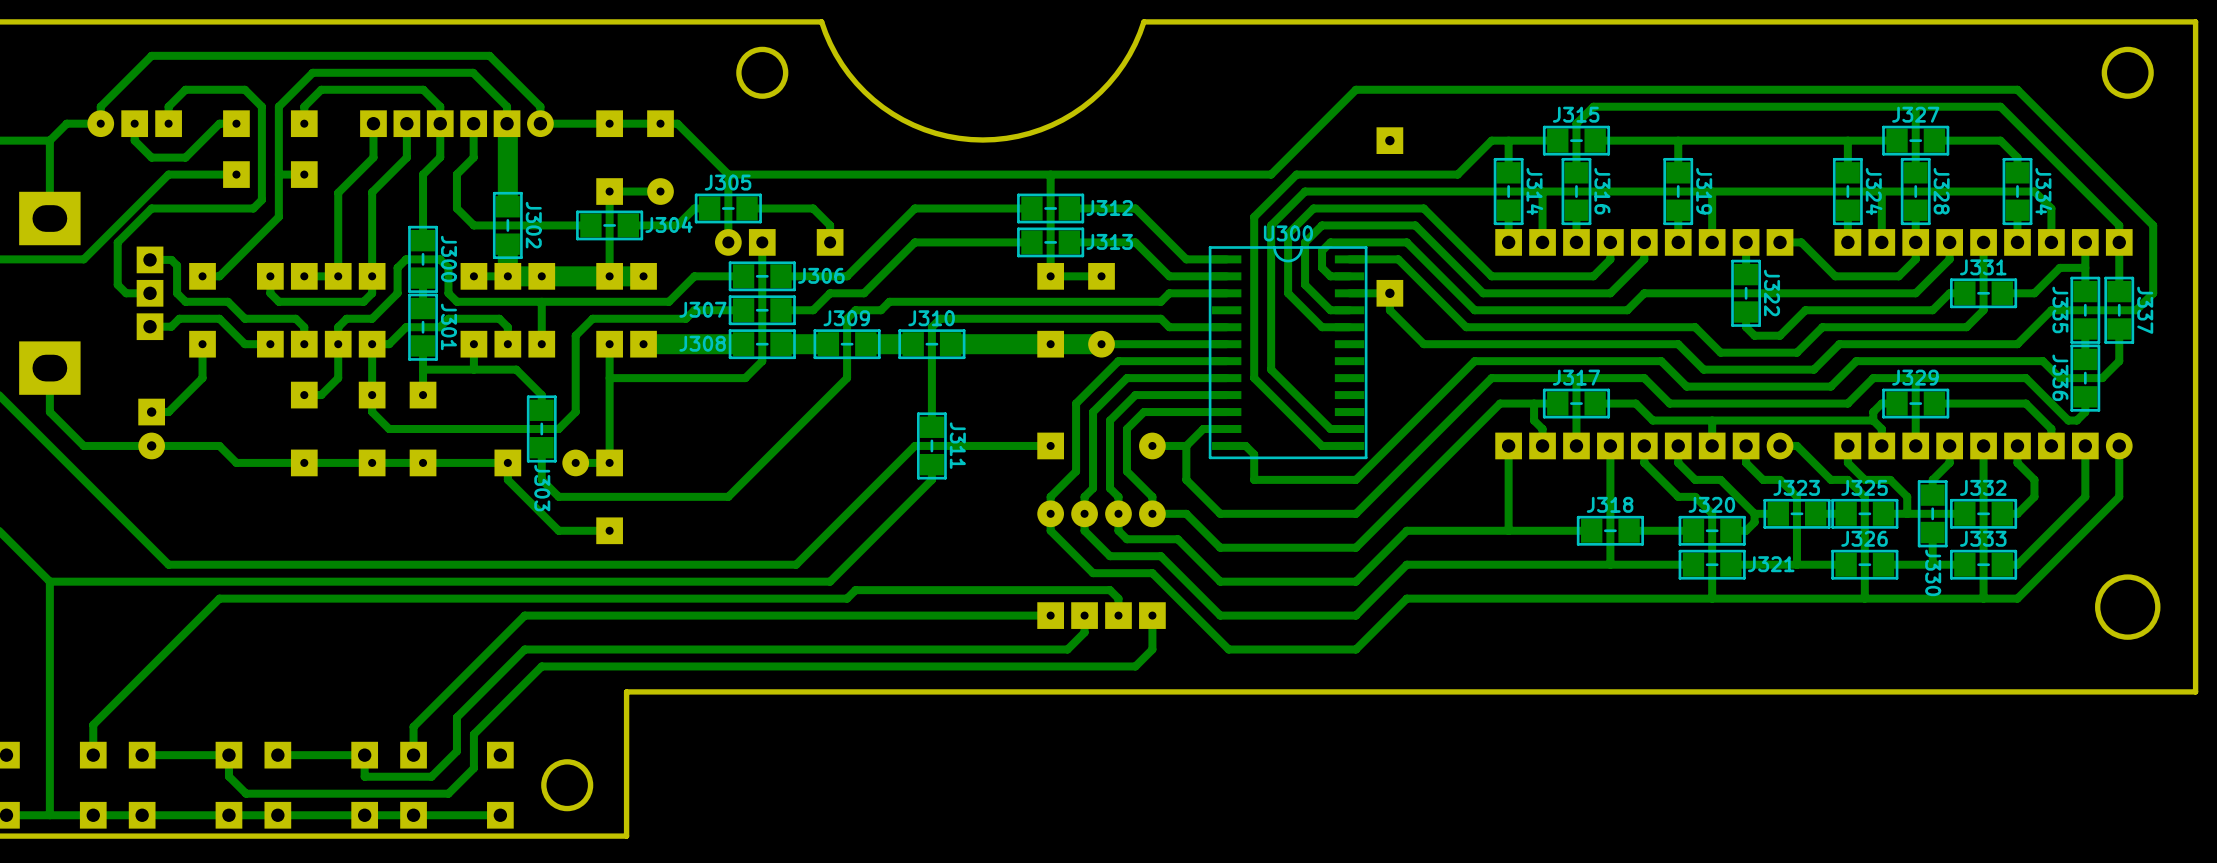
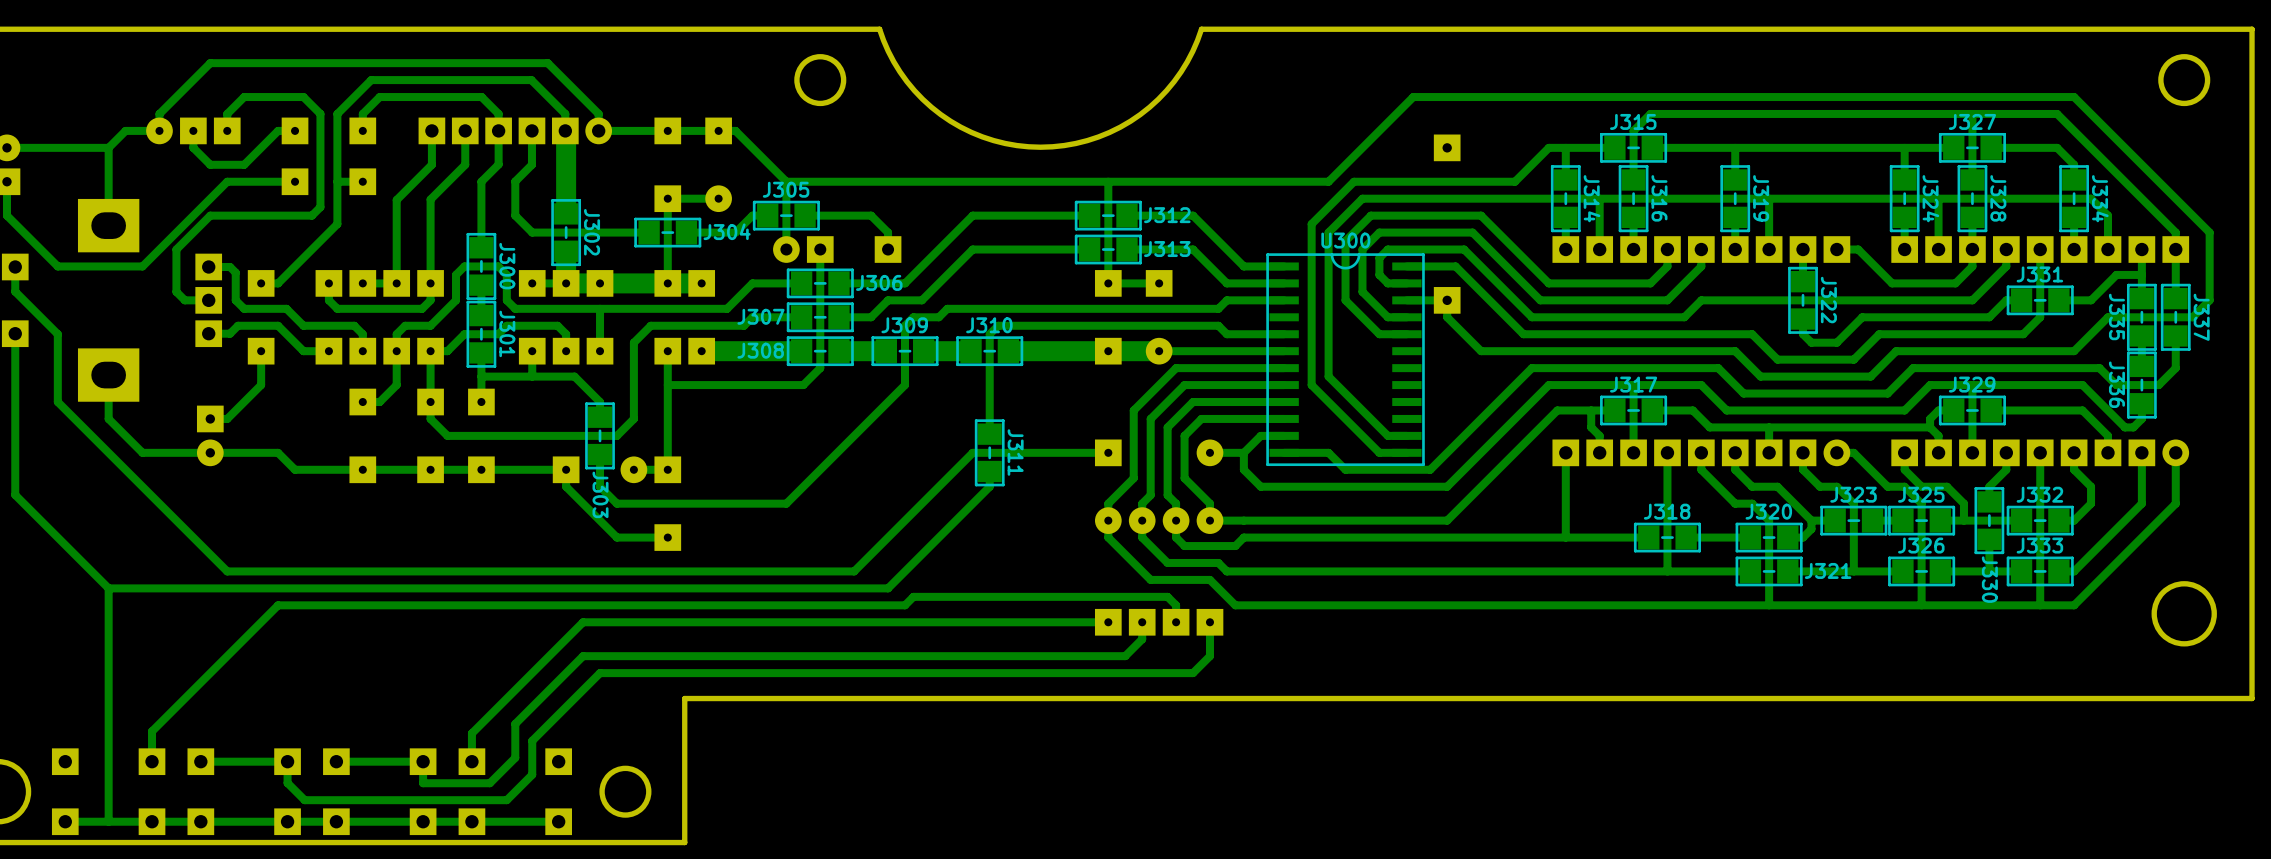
track: (1245, 445) (1254, 454) (1254, 479) -> (1303, 452) (1328, 452) (1345, 469) (1430, 469)
track: (1186, 462) (1186, 479) (1220, 513) -> (1243, 469) (1260, 486) (1311, 486)
track: (1372, 462) (1355, 479) -> (1447, 486) (1413, 486)
track: (1389, 479) (1355, 513) -> (1447, 520) (1413, 520)
track: (1389, 513) (1355, 547) (1220, 547) (1186, 513) -> (1277, 520) (1243, 520)
track: (1406, 530) (1355, 581) (1220, 581) (1177, 539) -> (1464, 537) (1243, 537) (1235, 546)
track: (1406, 564) (1355, 615) (1220, 615) (1169, 564) -> (1464, 571) (1226, 571)
track: (1406, 598) (1355, 649) (1228, 649) (1177, 598) -> (1464, 605) (1235, 605)

